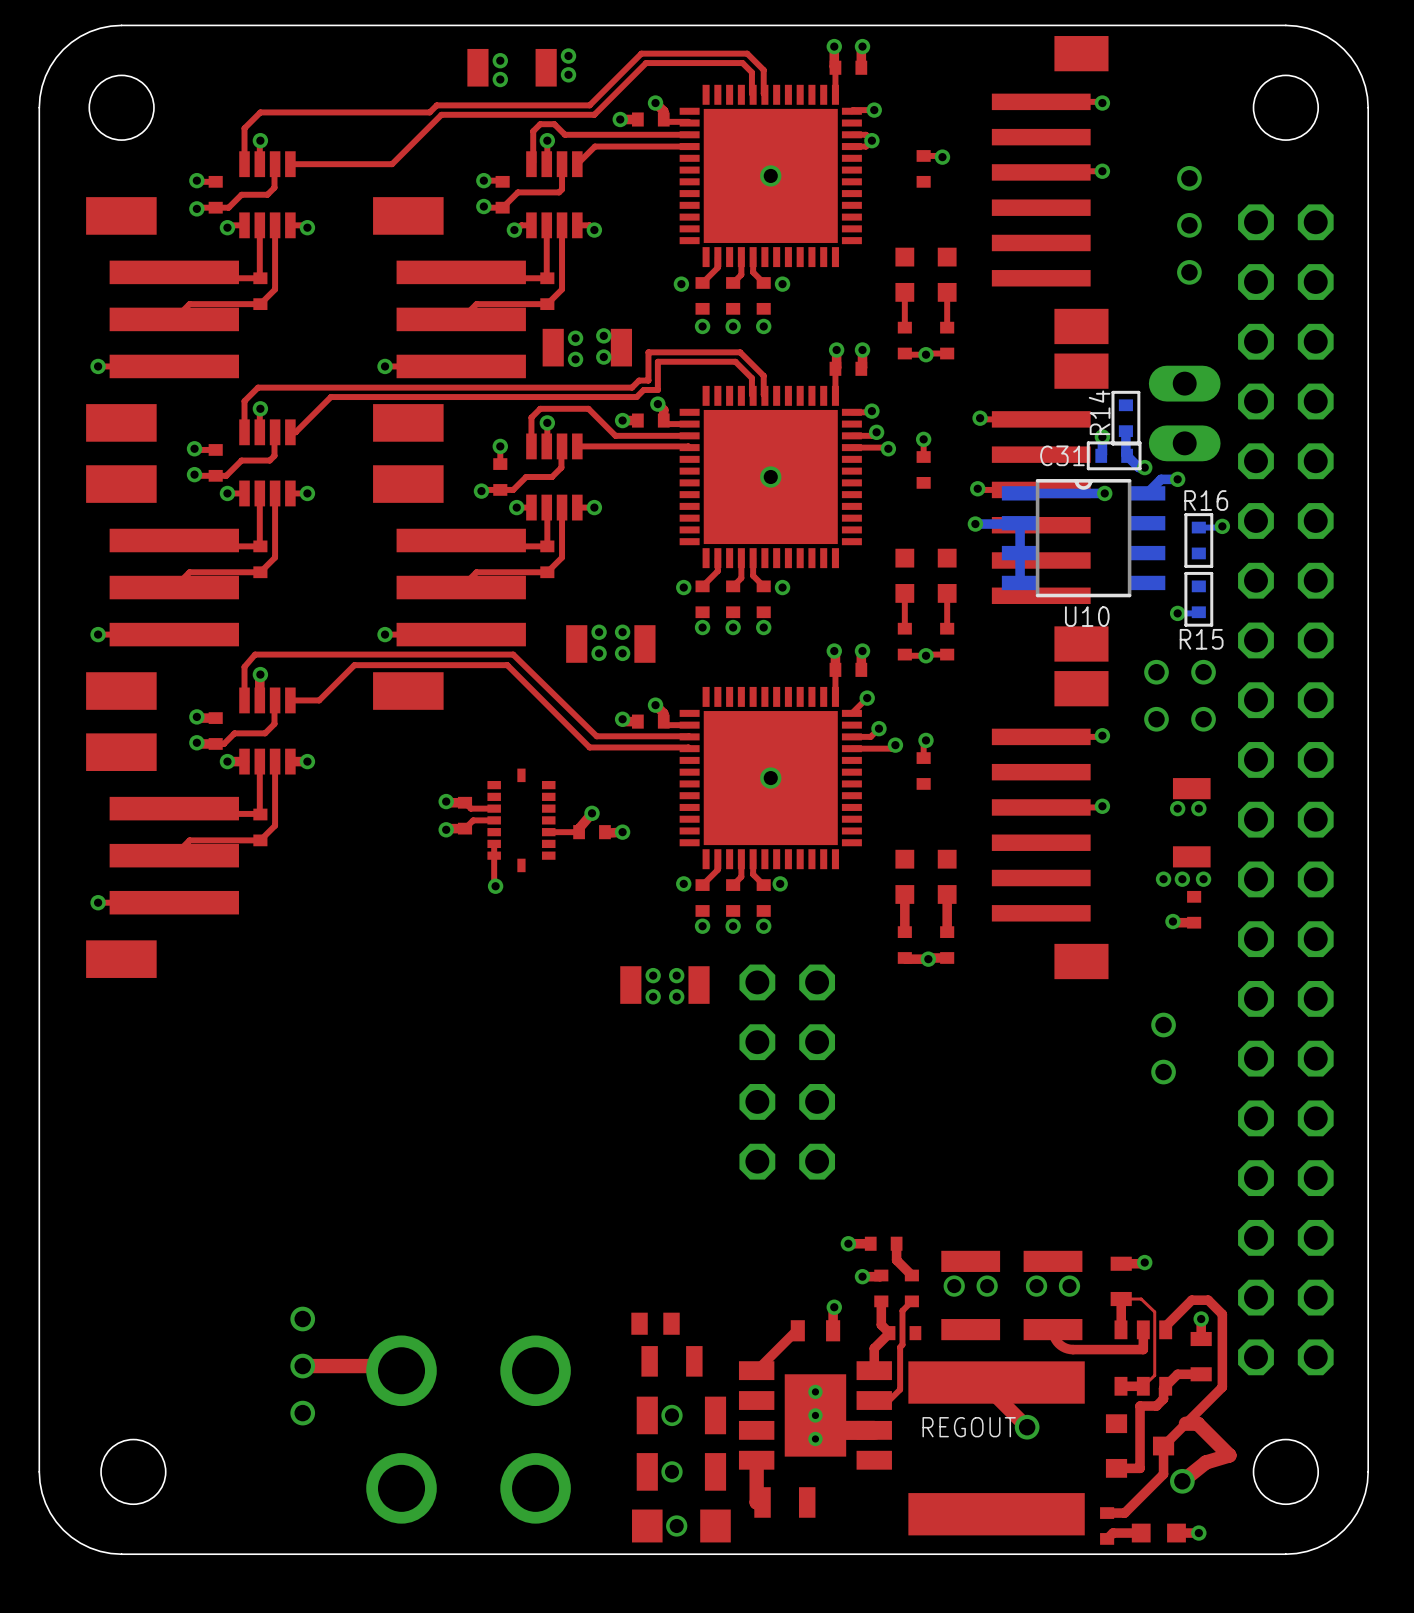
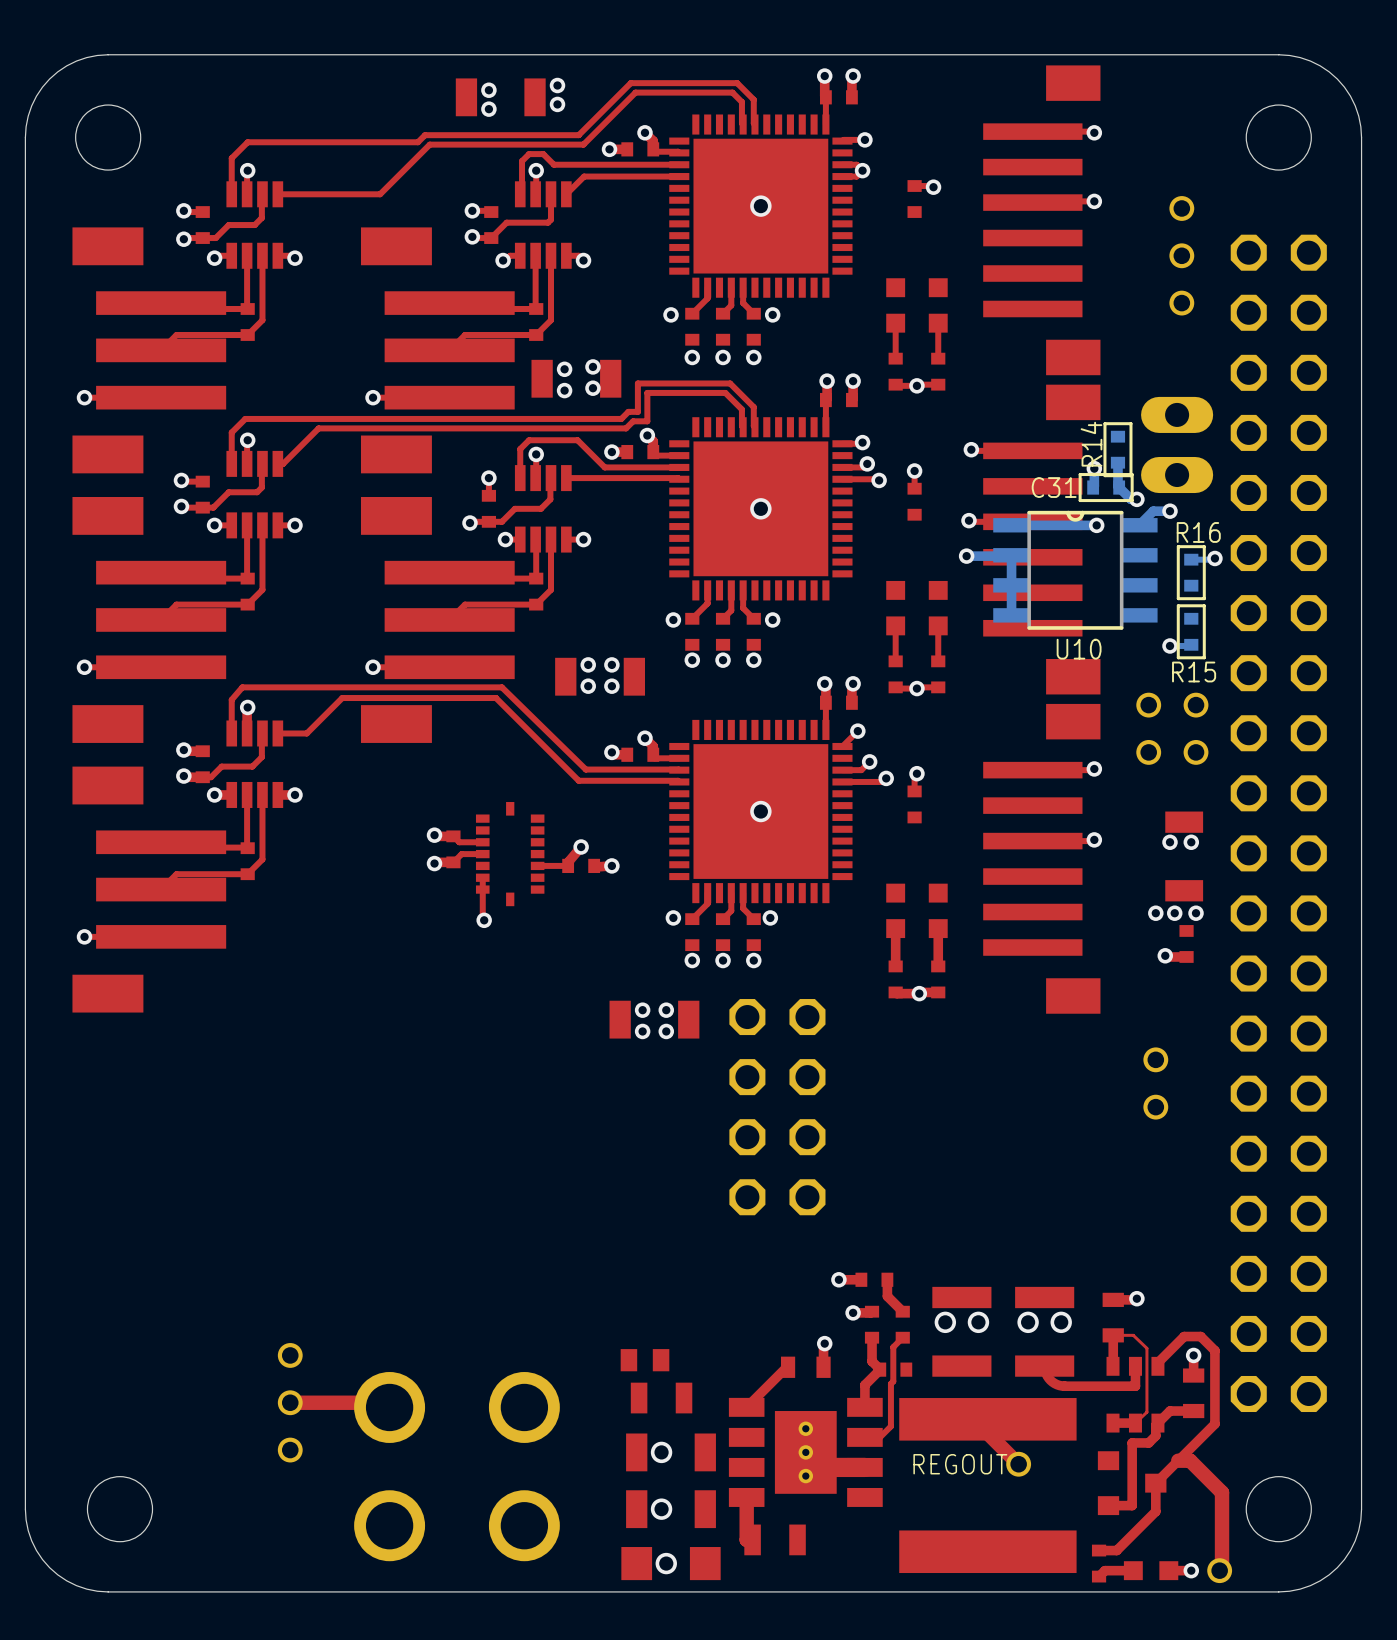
top track: (1229, 1455) (1205, 1462) (1182, 1481) -> (1222, 1492) (1222, 1568) (1219, 1570)
part position: (1182, 1481) -> (1219, 1570)

